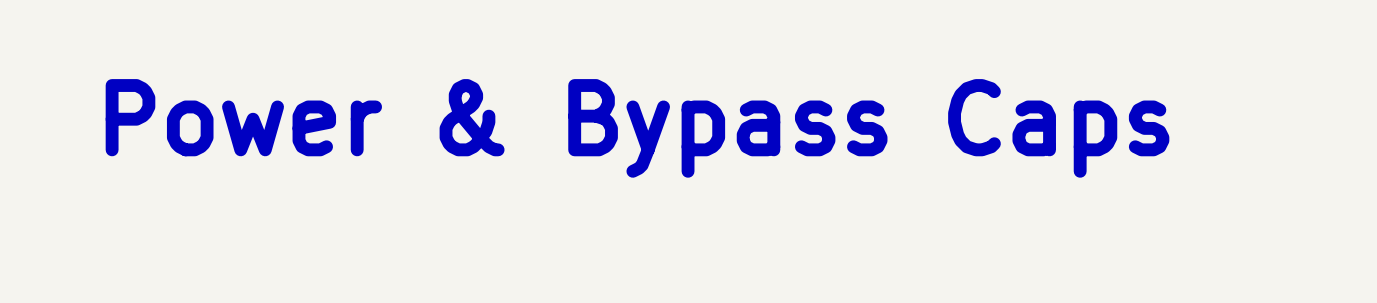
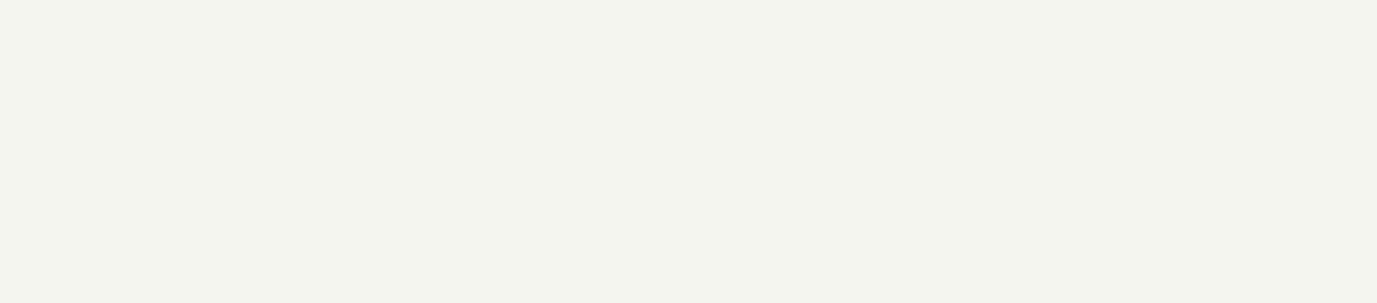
text: Power & Bypass Caps (637, 128) -> none

